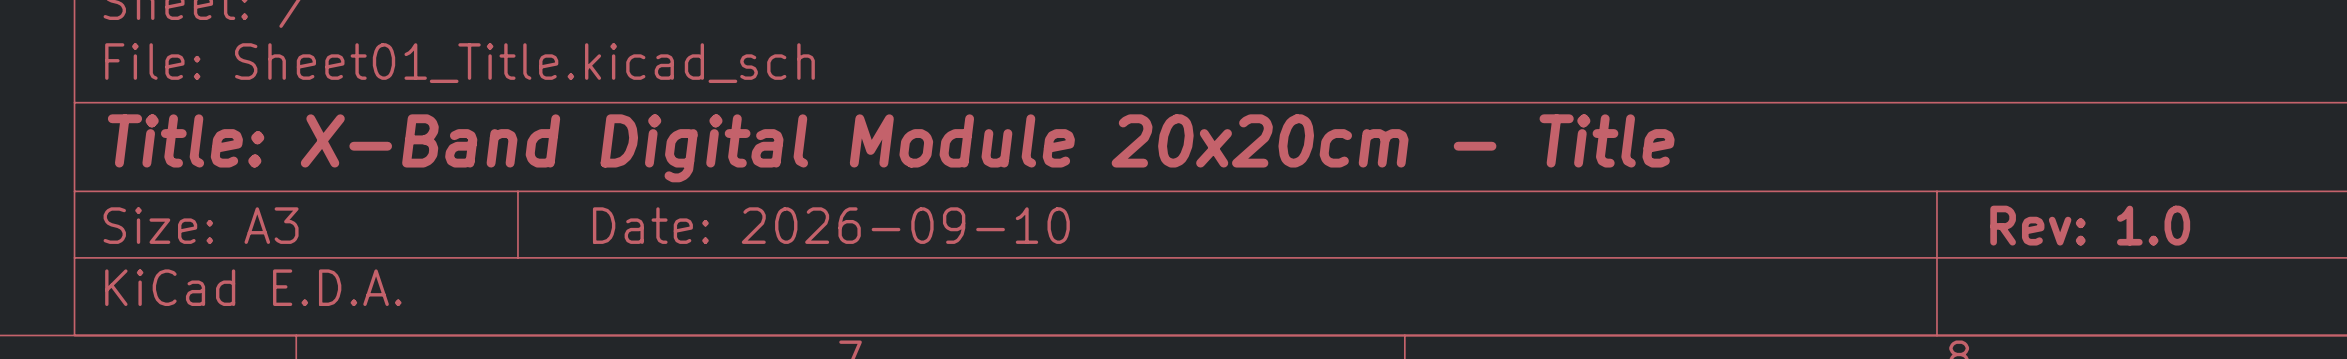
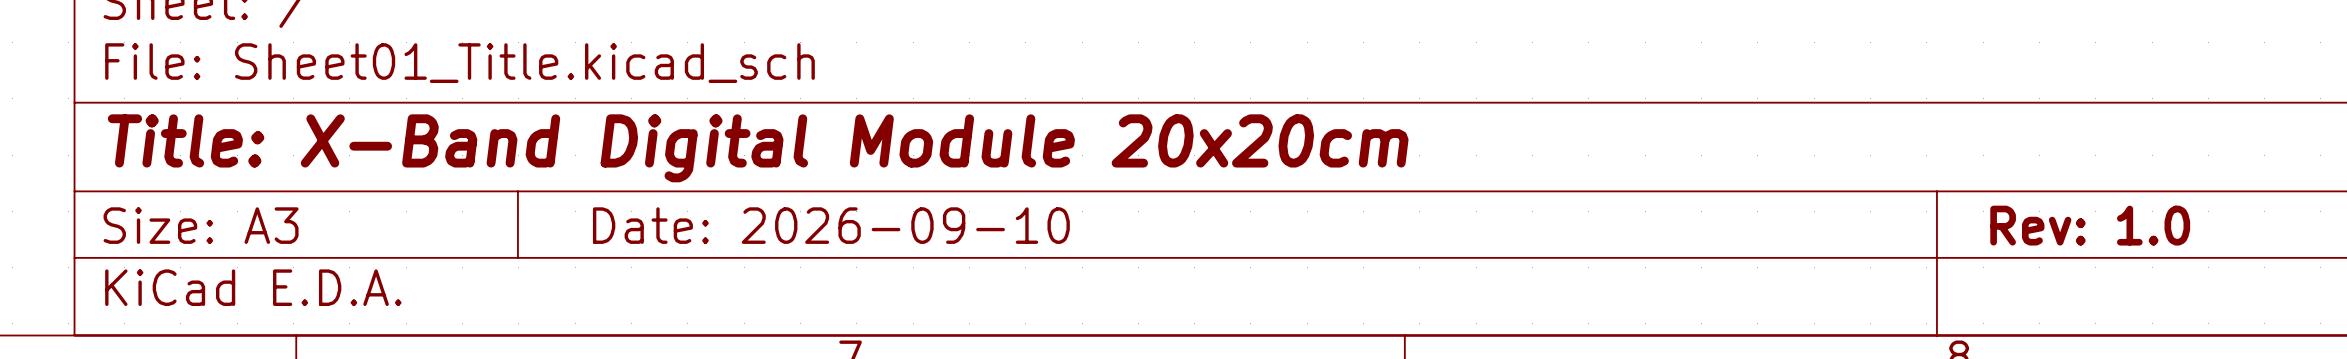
title block: Title: X-Band Digital Module 20x20cm - Title (891, 148) -> Title: X-Band Digital Module 20x20cm (758, 148)

